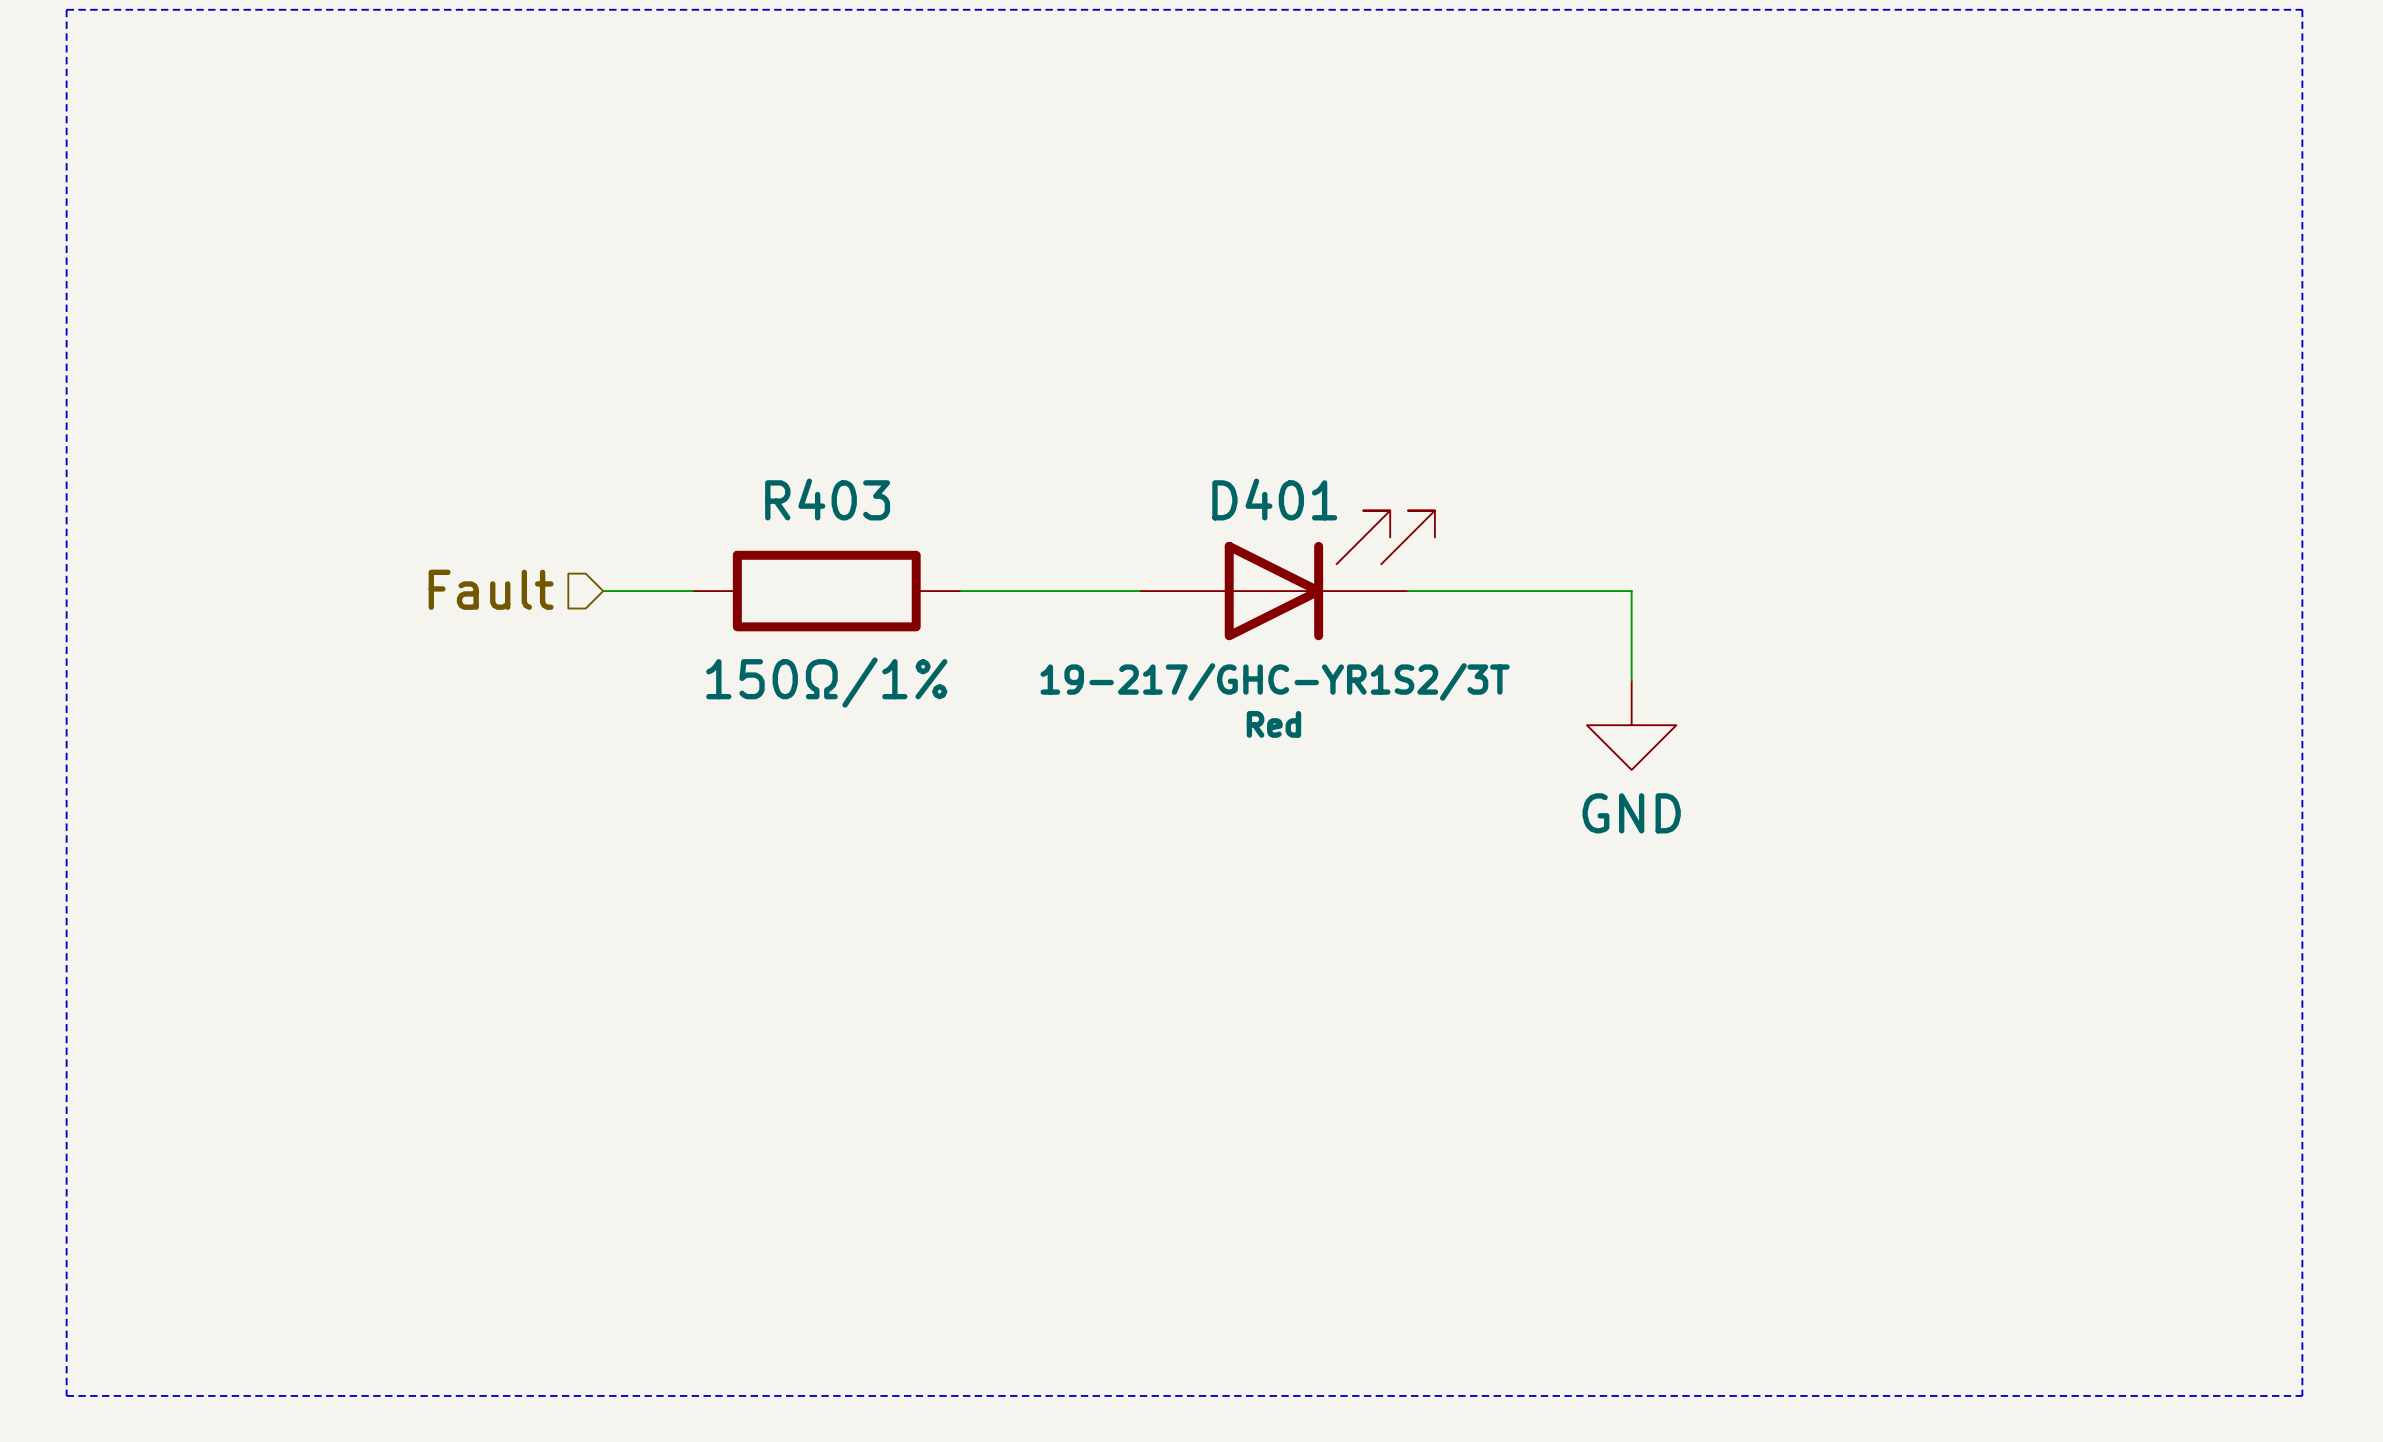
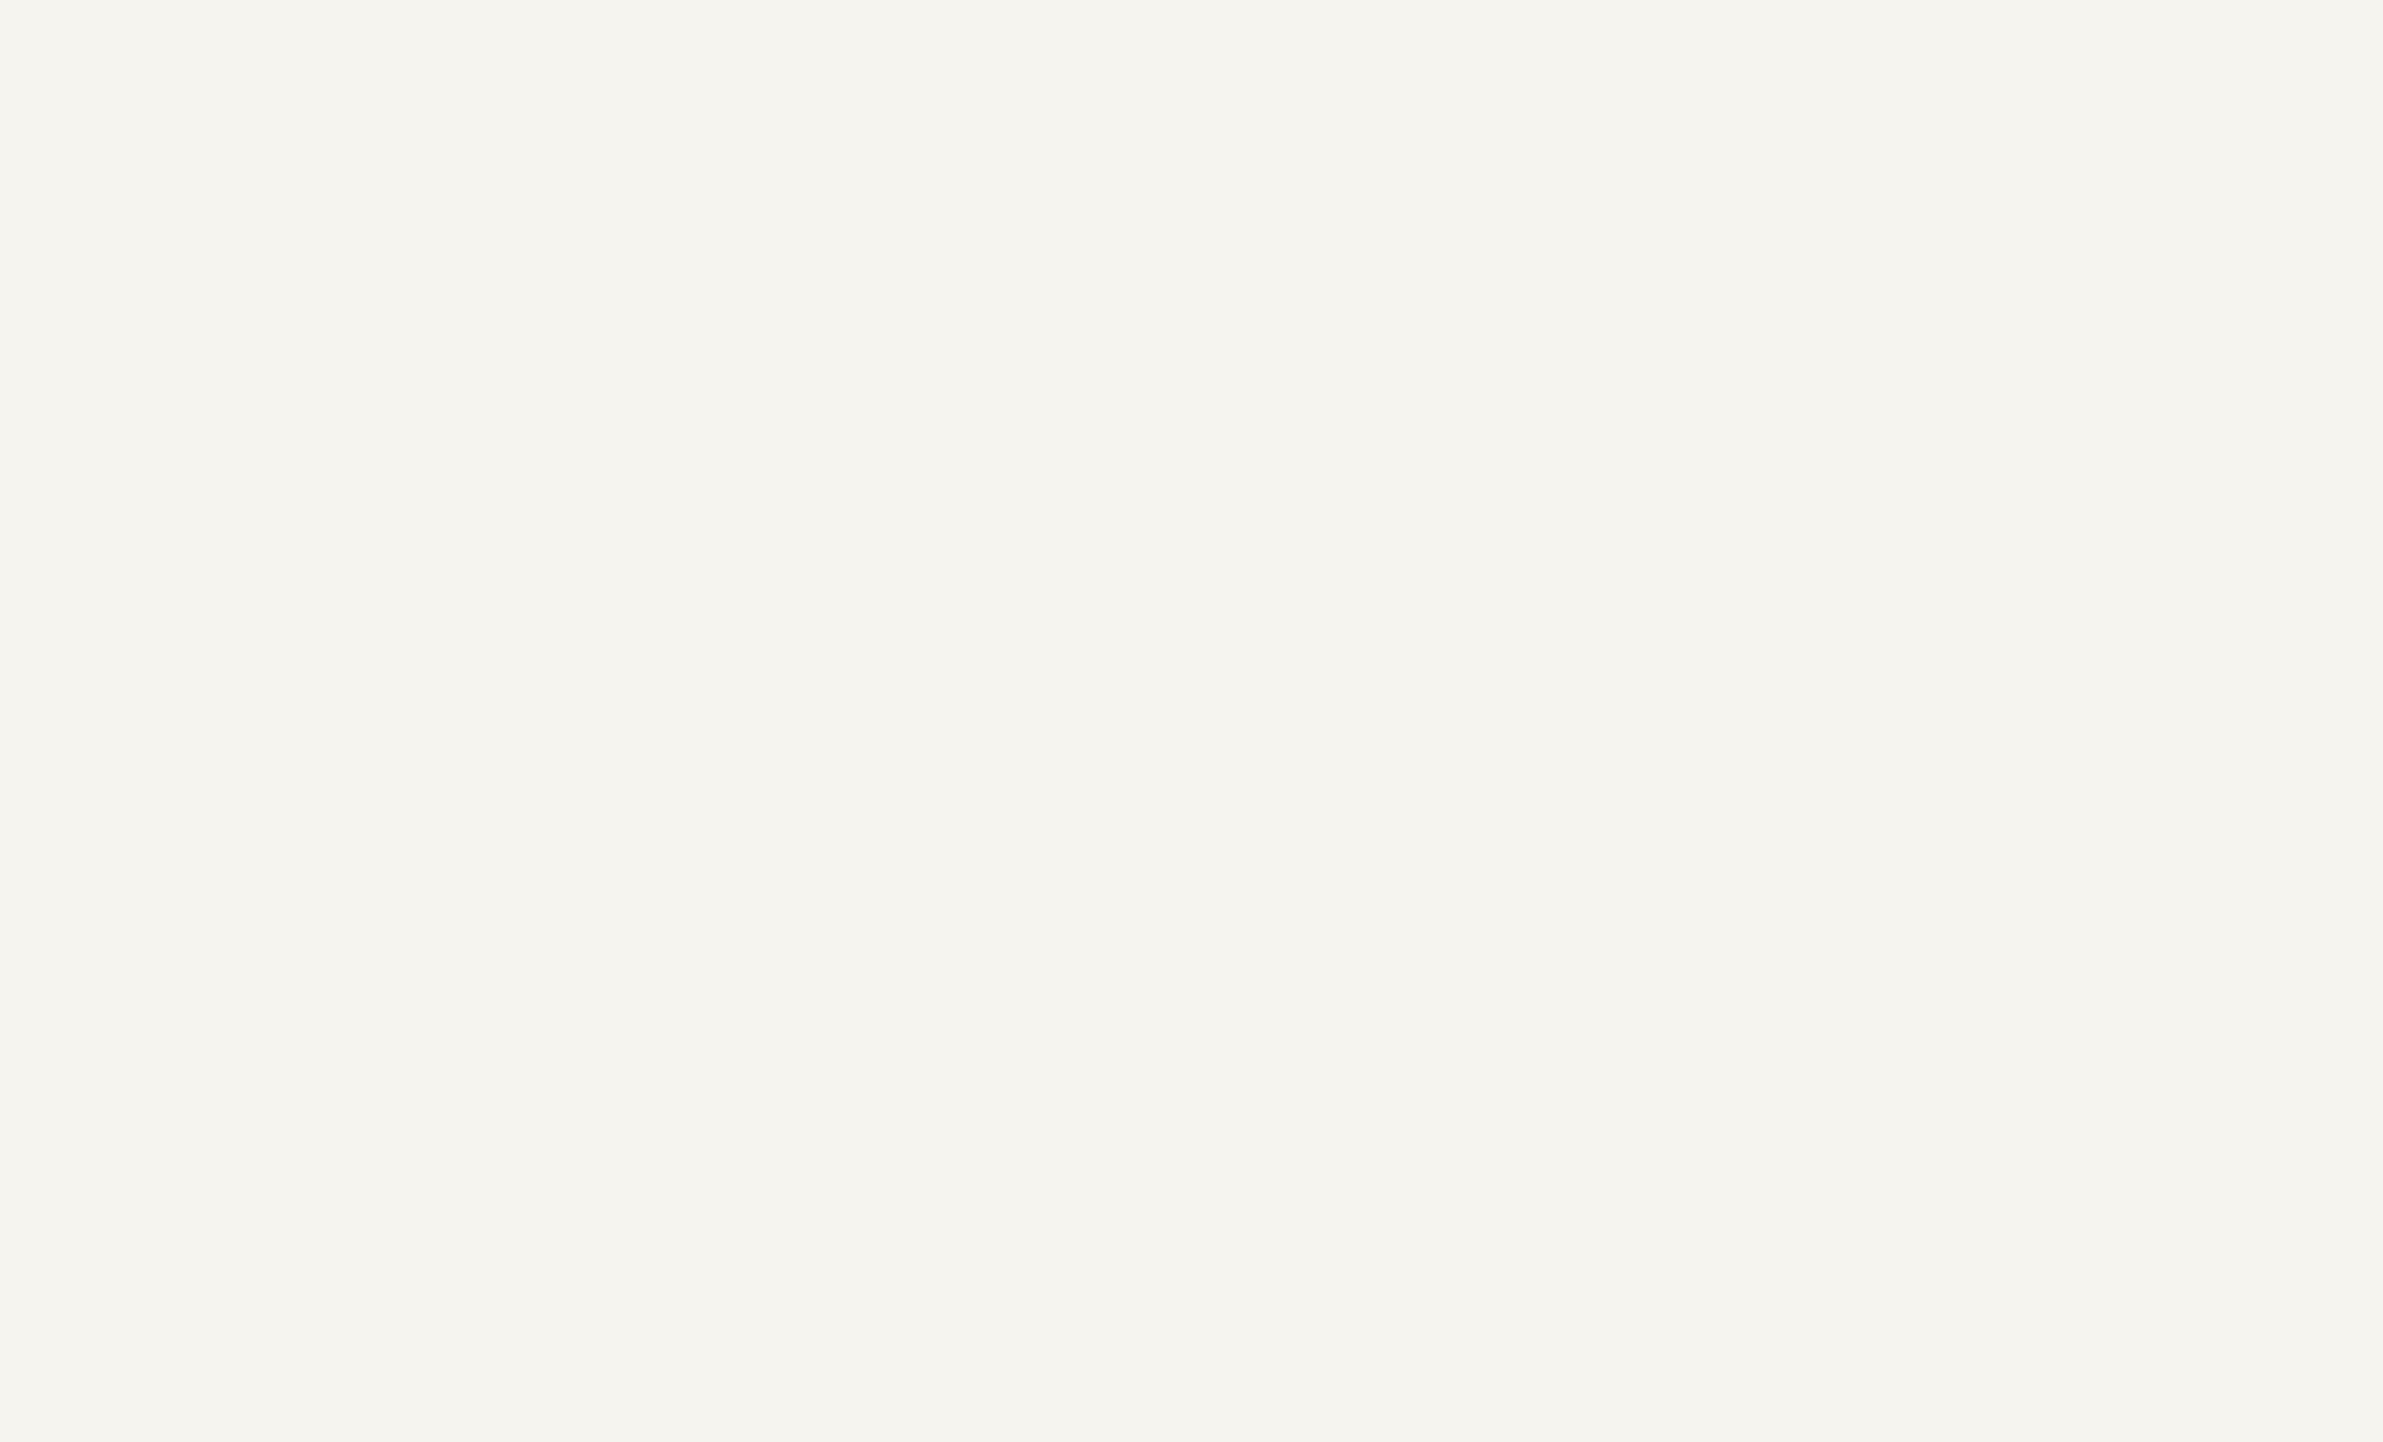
line: (66, 9) (2302, 9) (2302, 1395) (66, 1395) (66, 9) -> none
D401: 19-217/GHC-YR1S2/3T (1287, 575) -> none
hierarchical label: Fault (491, 589) -> none
wire: (603, 591) (692, 591) -> none
R403: 150Ω/1% (826, 591) -> none
wire: (960, 591) (1139, 591) -> none
wire: (1408, 591) (1631, 591) (1631, 680) -> none
power symbol: GND (1631, 725) -> none

